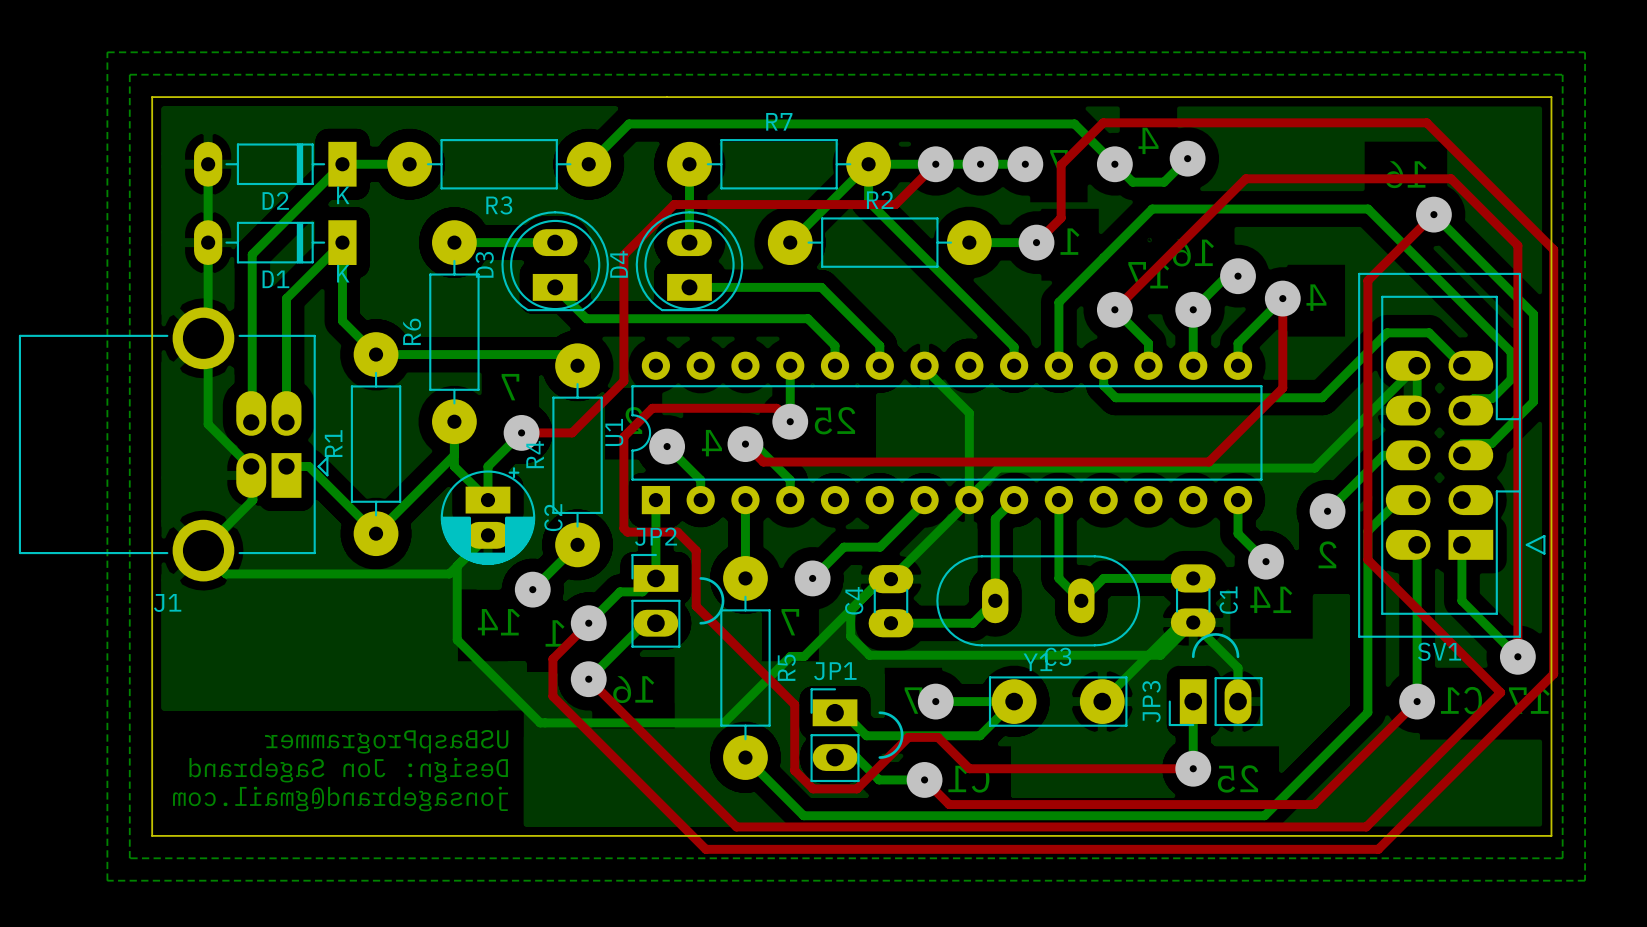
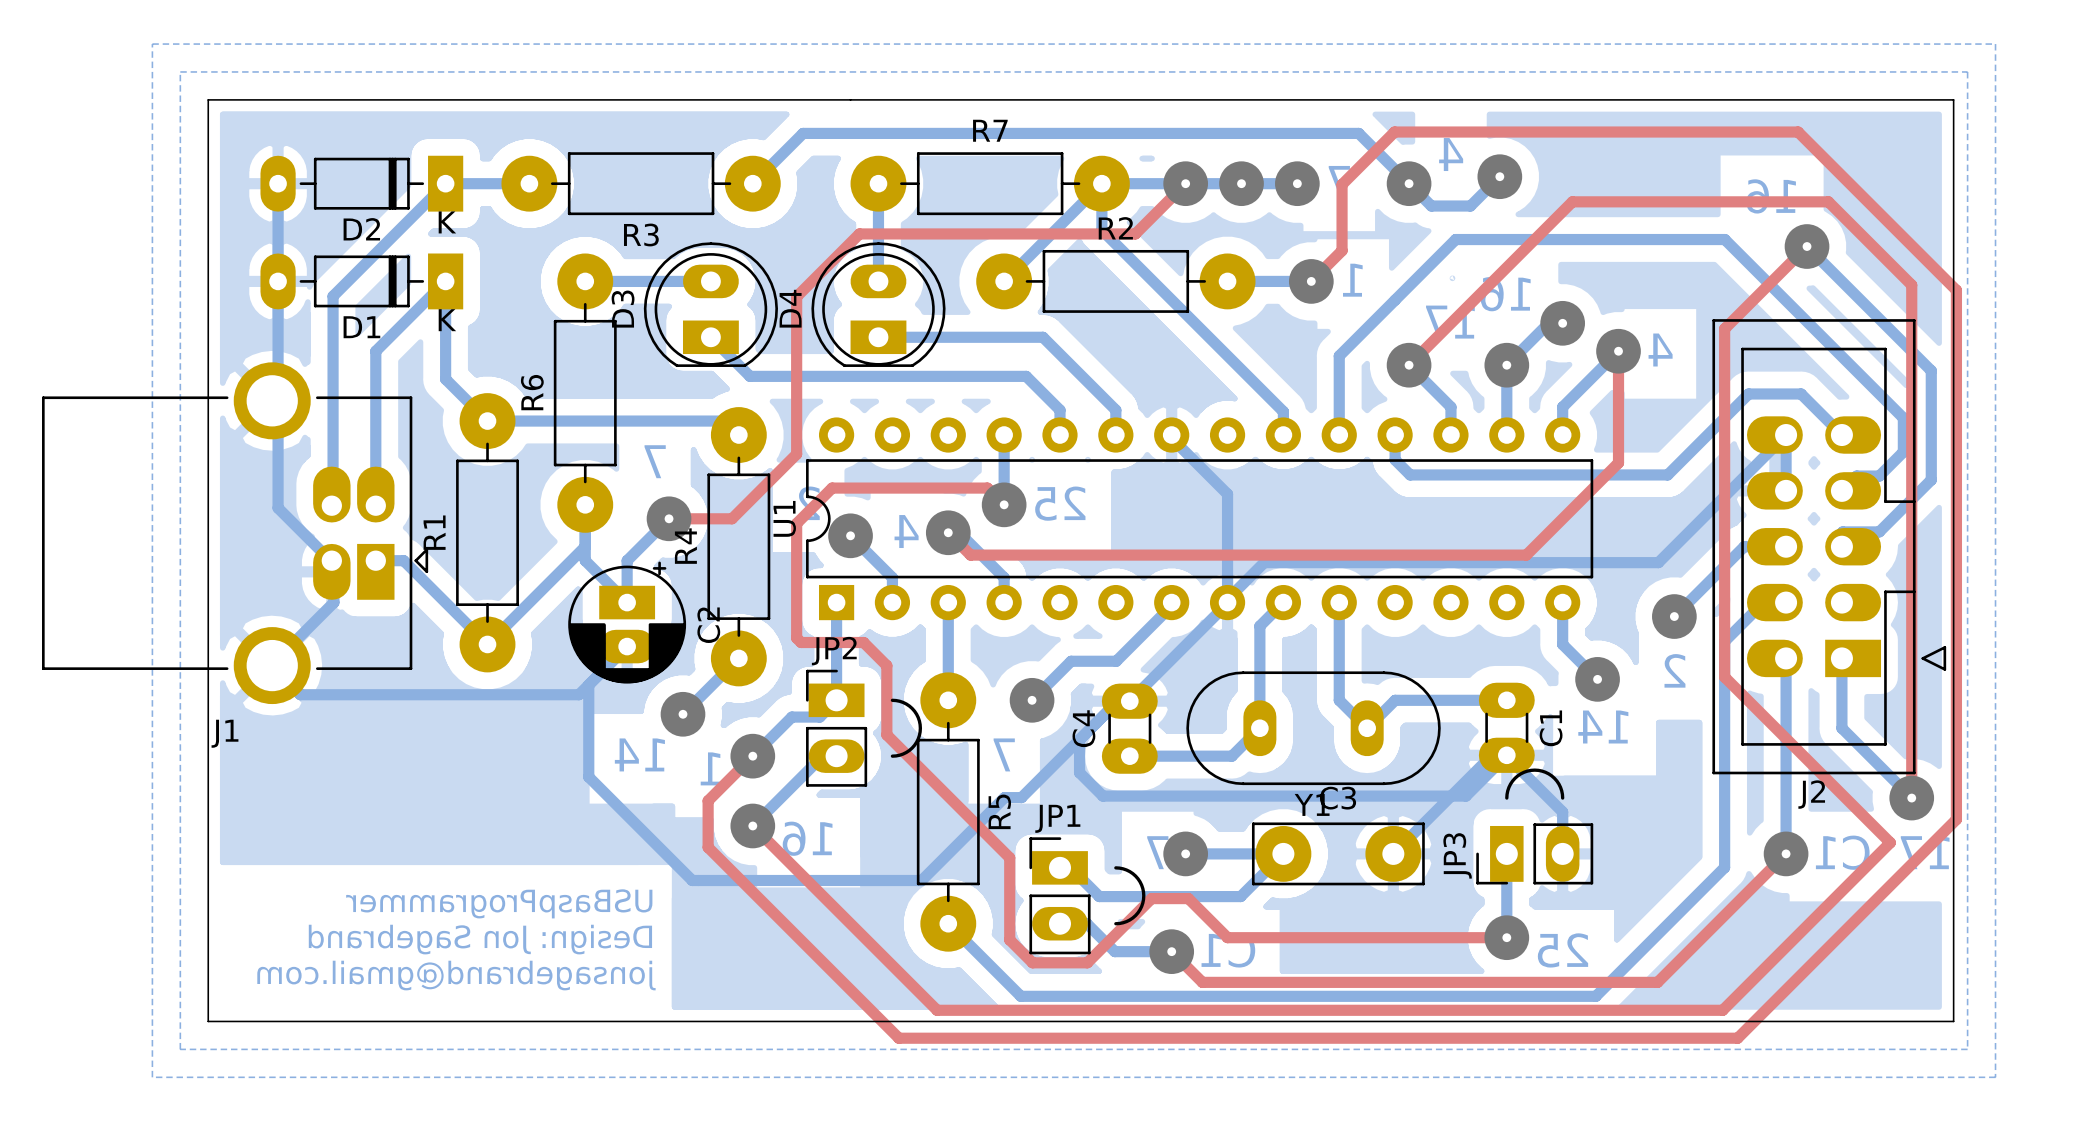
SV1 name: SV1 (1439, 651) -> J2 (1811, 794)

